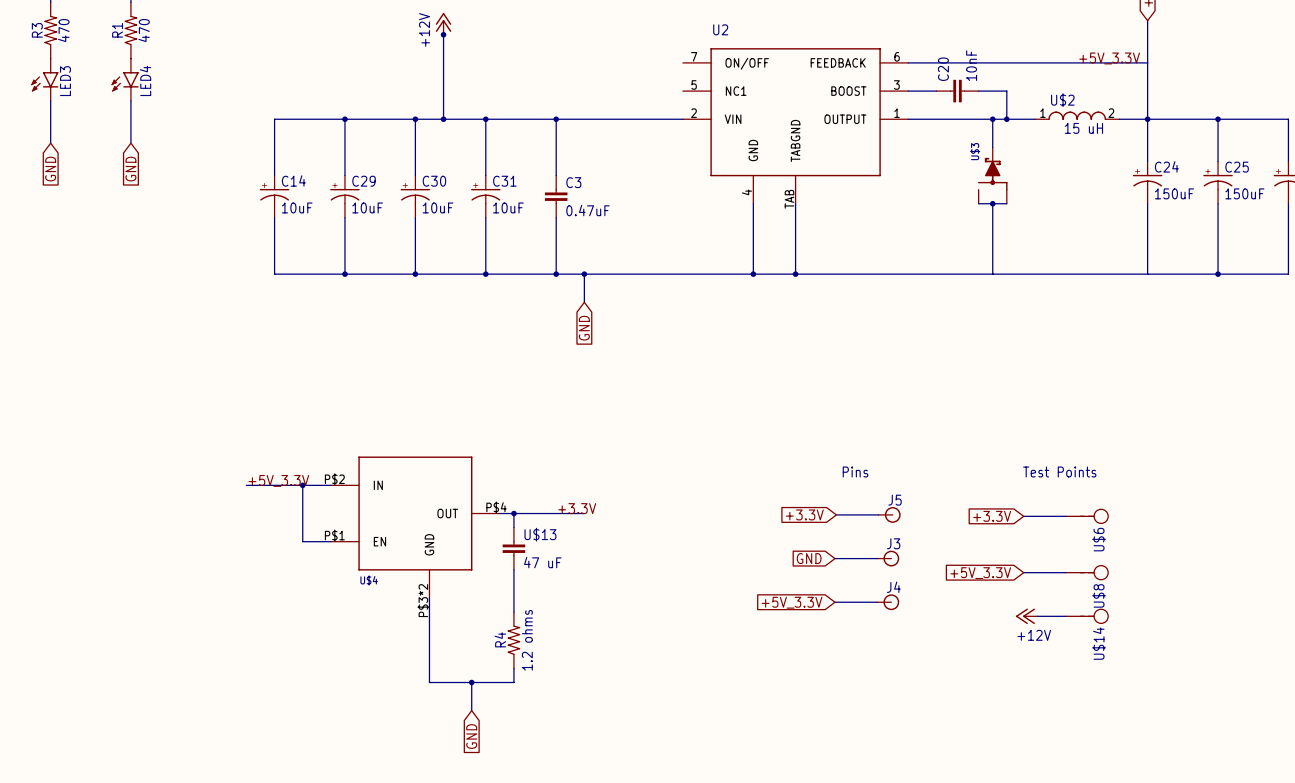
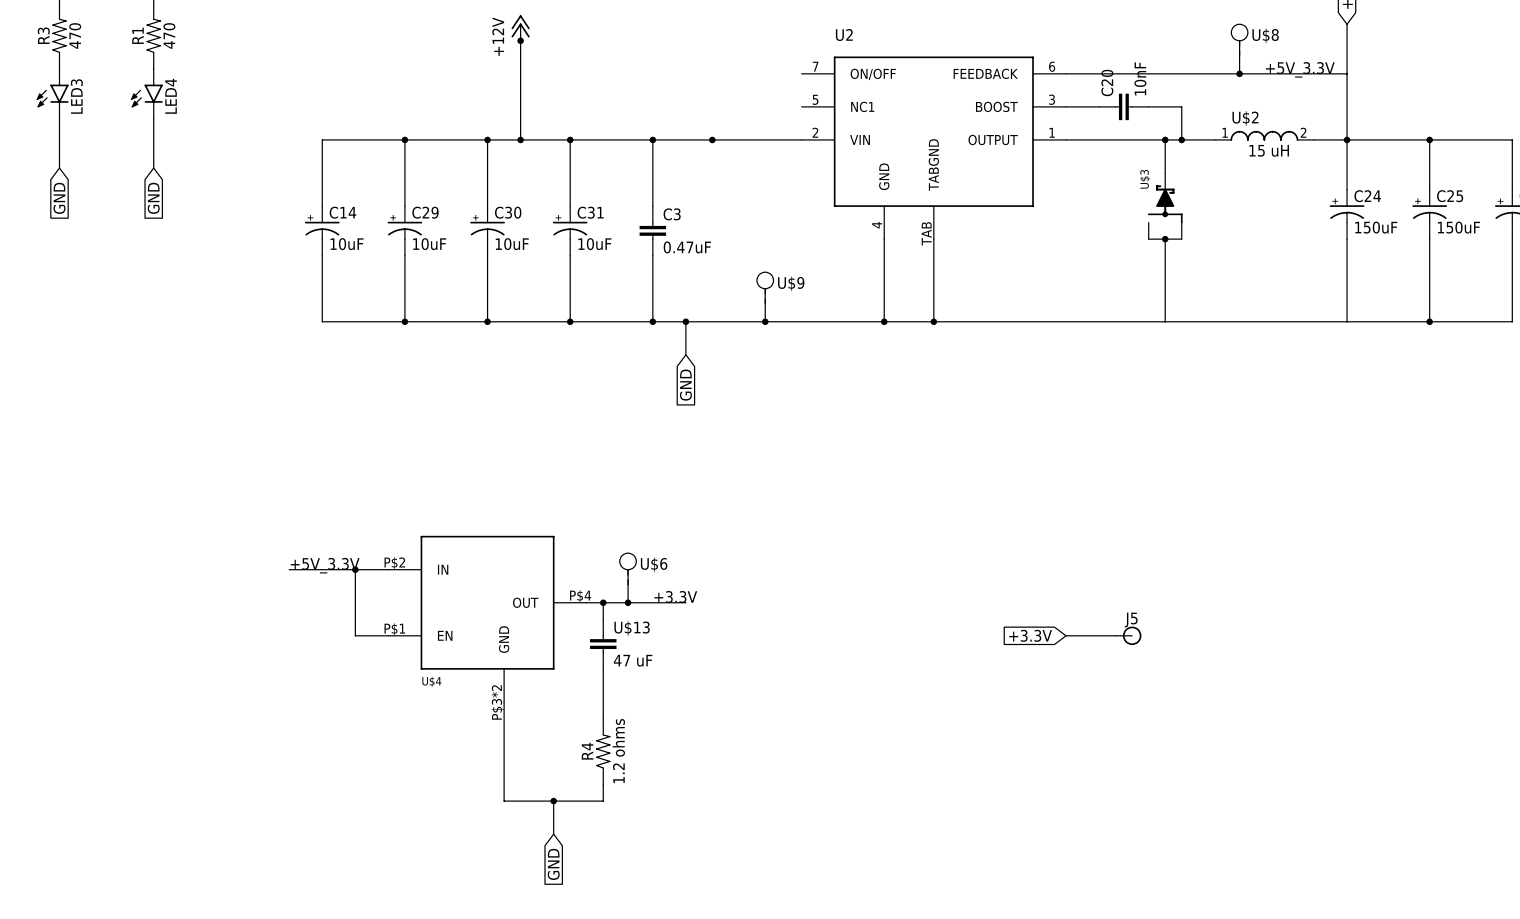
junction: none -> (1239, 73)
junction: none -> (712, 139)
U$9: none -> (765, 296)
junction: none -> (765, 321)
text: Pins (855, 471) -> none
text: Test Points (1059, 471) -> none
junction: none -> (628, 602)
global label: +3.3V (804, 514) -> none
wire: (836, 514) (878, 514) -> none
J5 position: (889, 514) -> (1128, 635)
global label: +3.3V (992, 516) -> none
wire: (1023, 516) (1065, 516) -> none
U$6 position: (1087, 516) -> (628, 577)
U$6 rotation: 0° (1094, 516) -> 90° counterclockwise (628, 569)
global label: none -> +3.3V (1030, 635)
global label: GND (809, 558) -> none
wire: (835, 558) (877, 558) -> (1066, 635) (1115, 635)
J3: (888, 558) -> none
wire: (1023, 572) (1065, 572) -> none
U$8 position: (1087, 572) -> (1239, 48)
U$8 rotation: 0° (1094, 572) -> 90° counterclockwise (1239, 40)
global label: +5V_3.3V (980, 573) -> none
global label: +5V_3.3V (792, 602) -> none
wire: (835, 602) (877, 602) -> none
J4: (888, 602) -> none
power symbol: +12V (1026, 616) -> none
wire: (1037, 616) (1065, 616) -> none
U$14: (1087, 616) -> none

